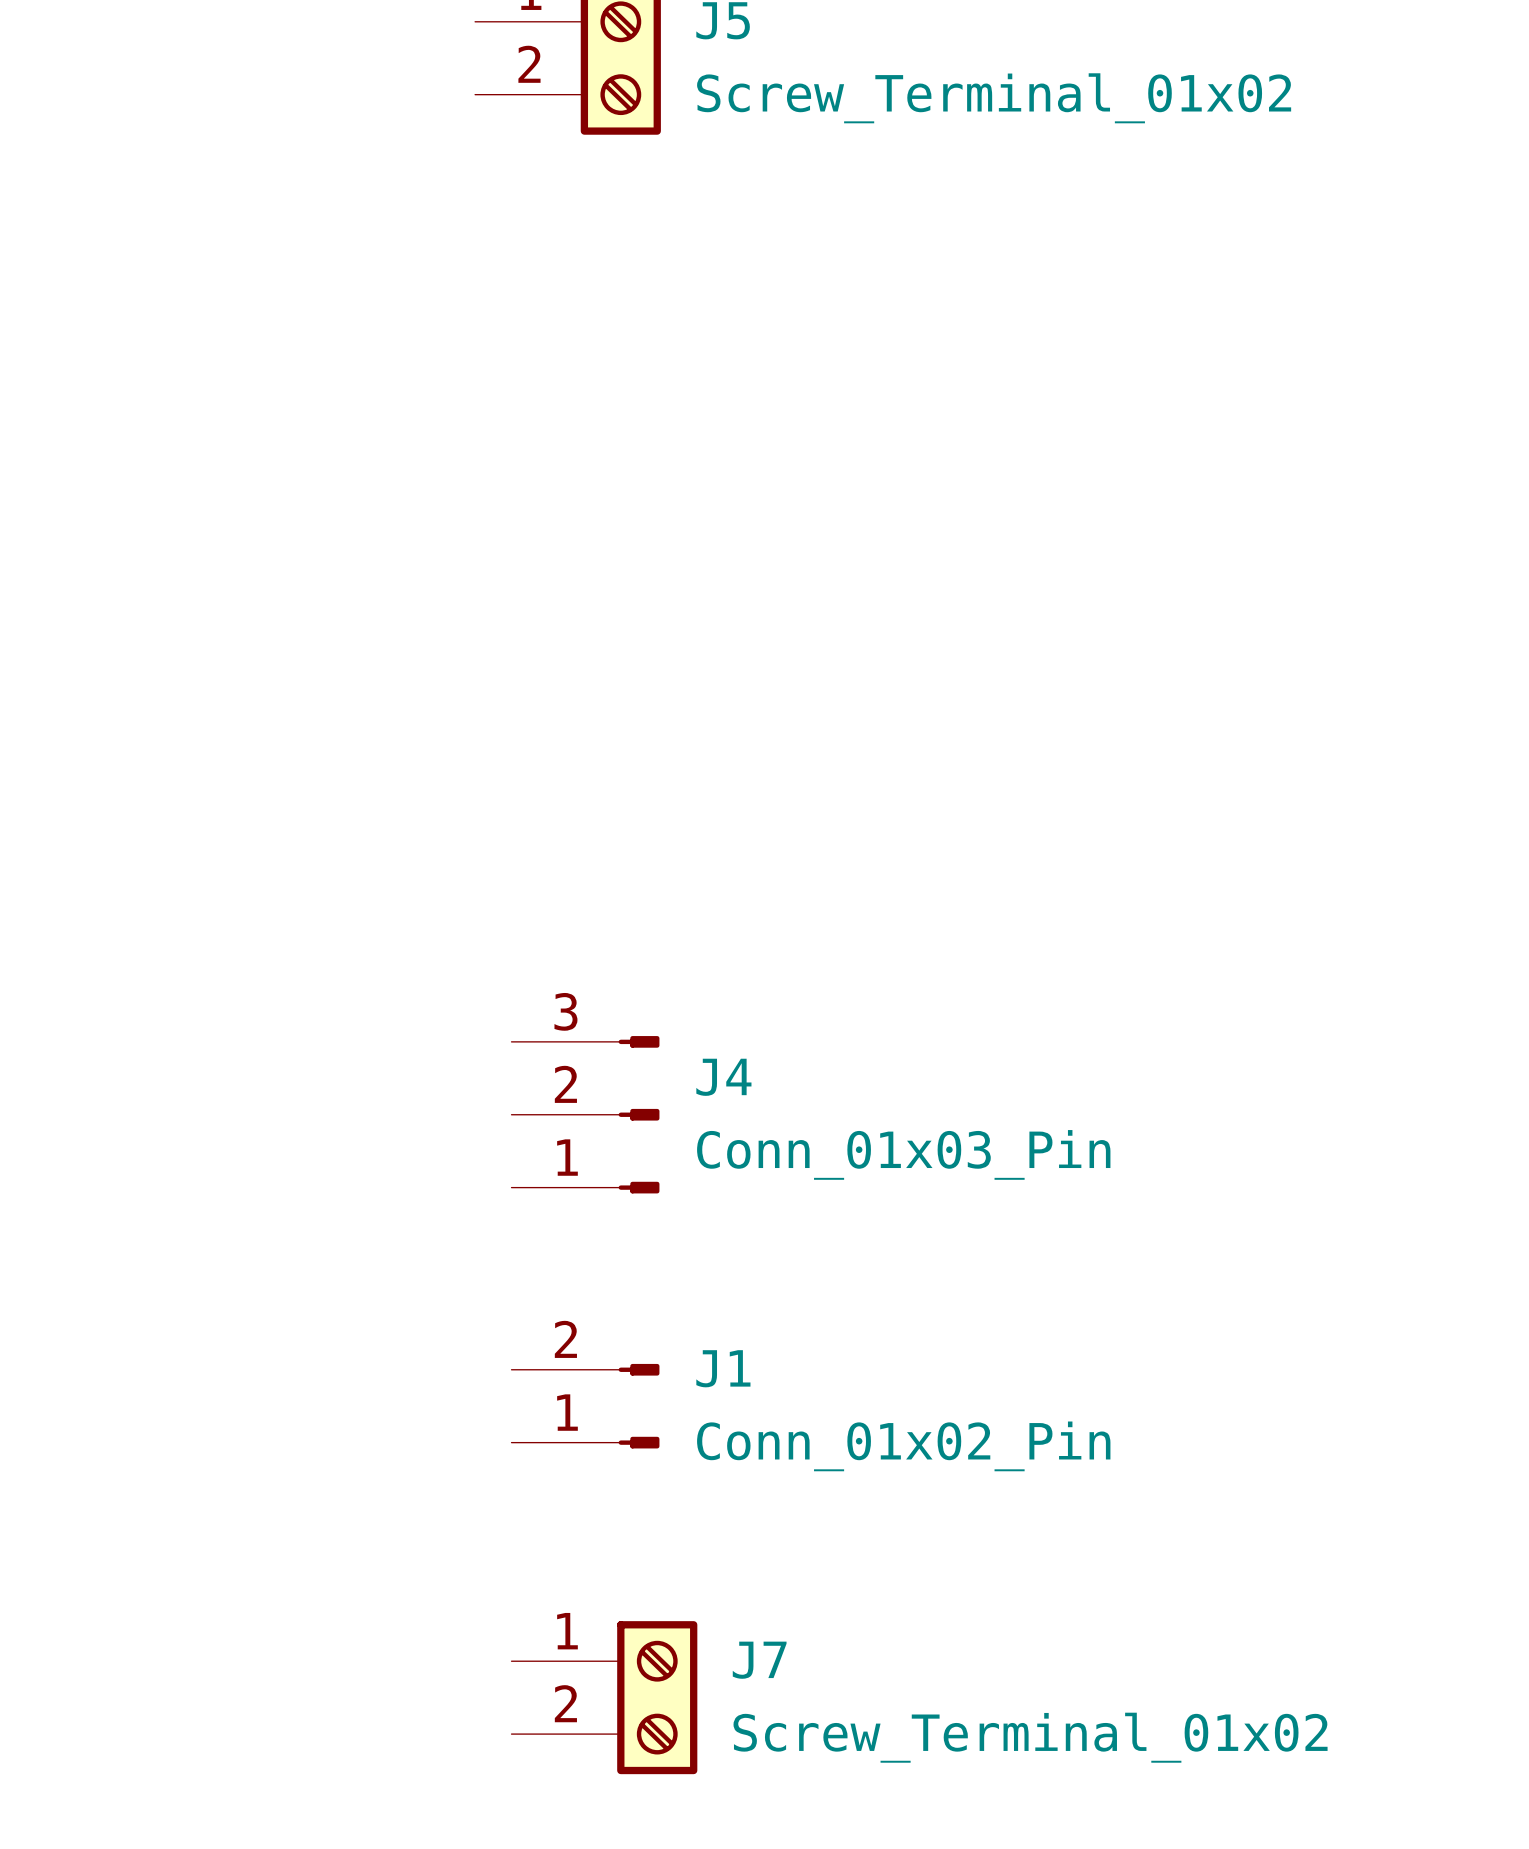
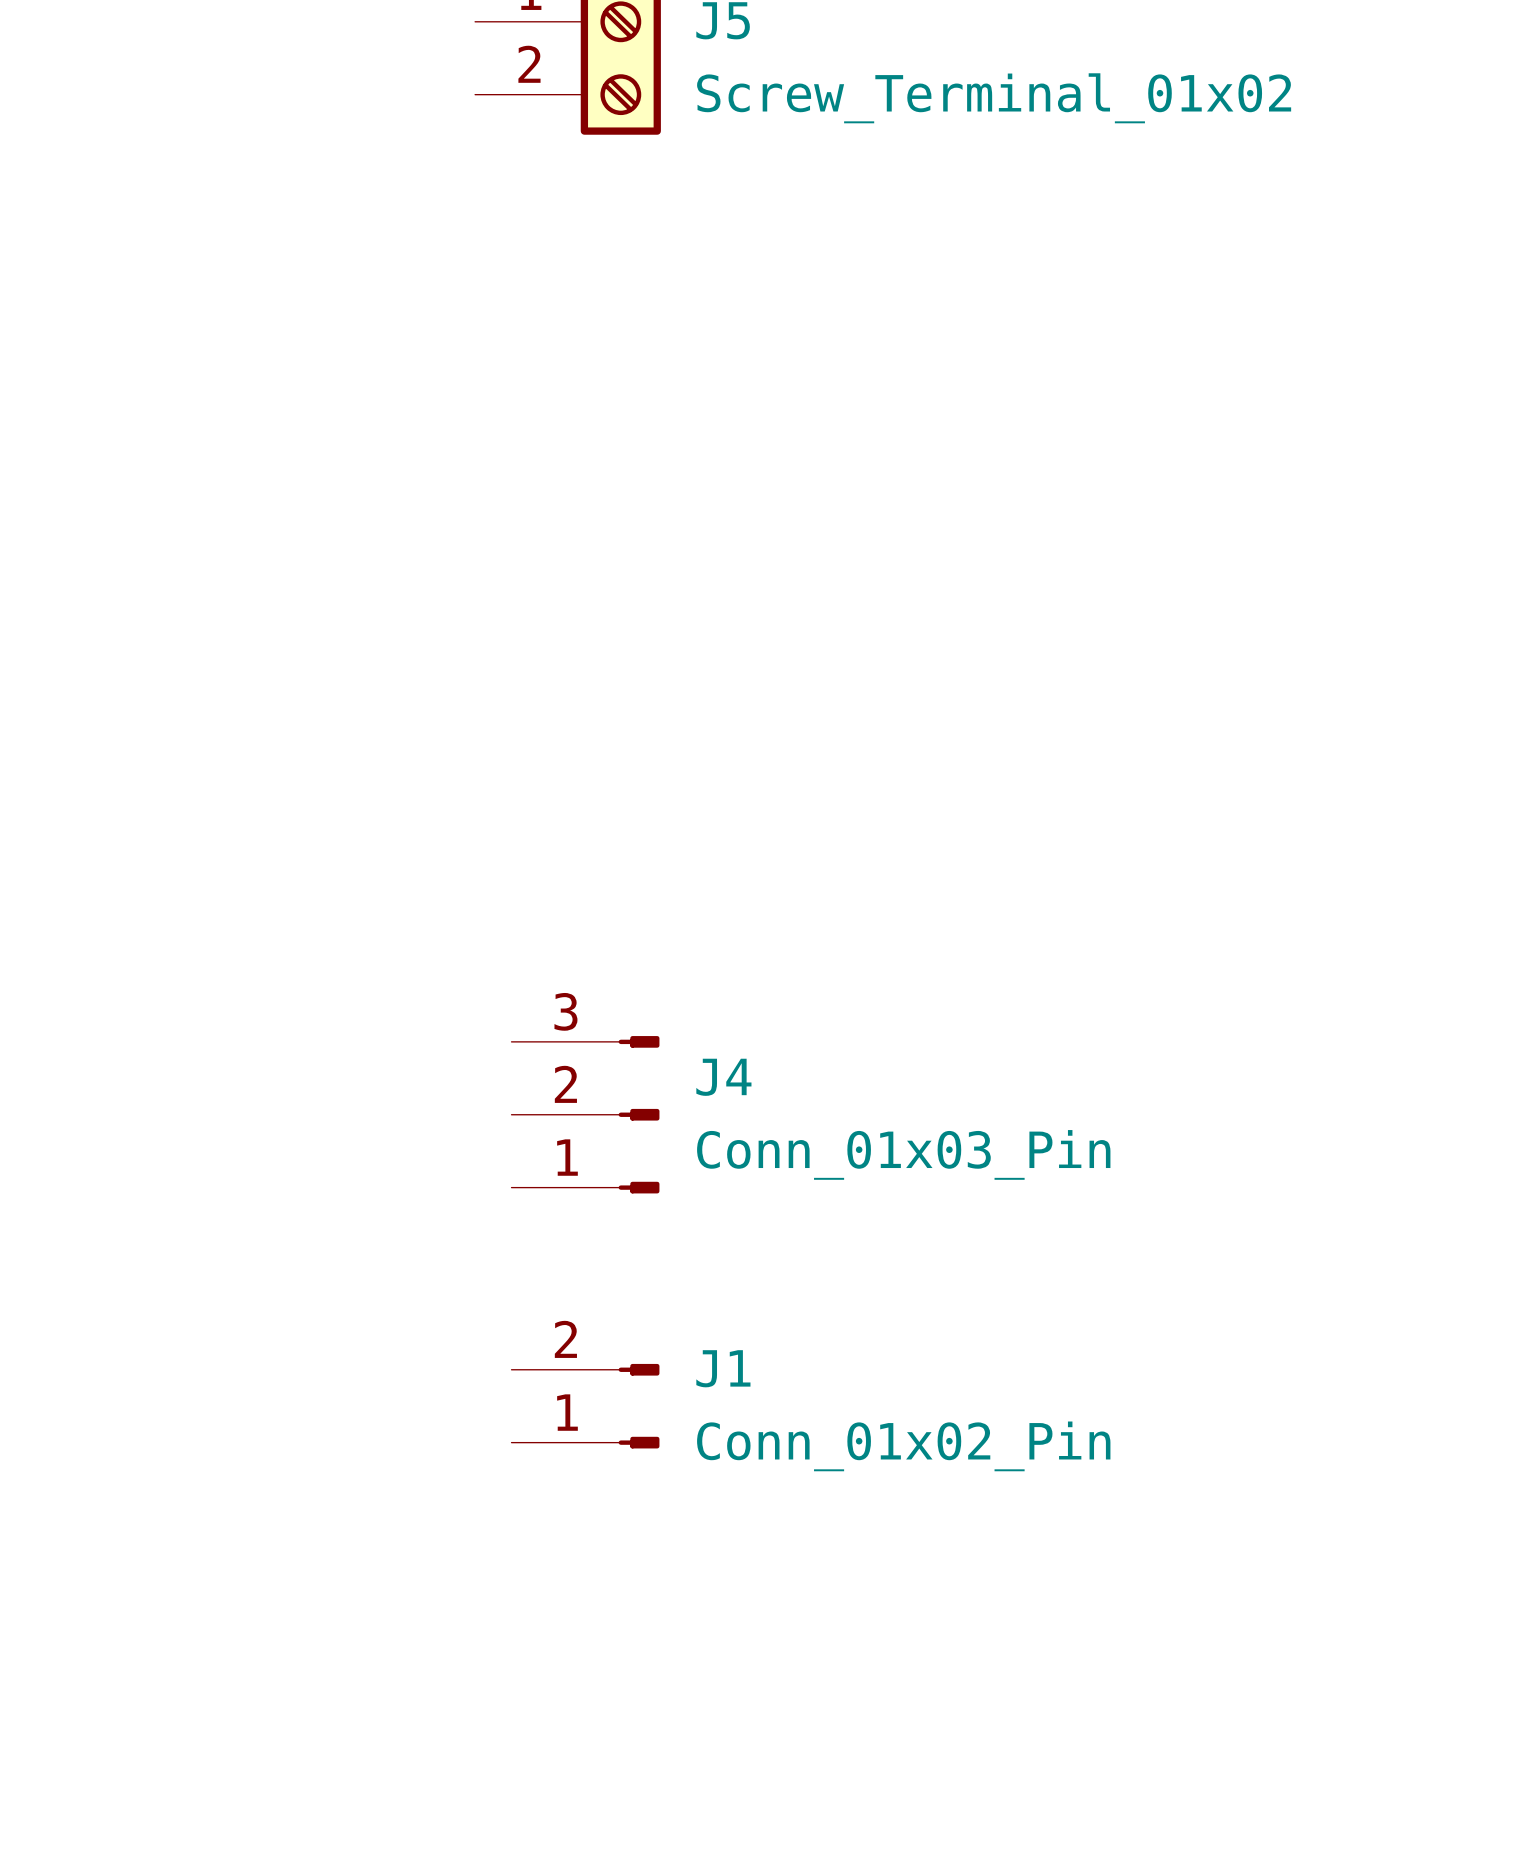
J7: Screw_Terminal_01x02 (604, 1697) -> none

